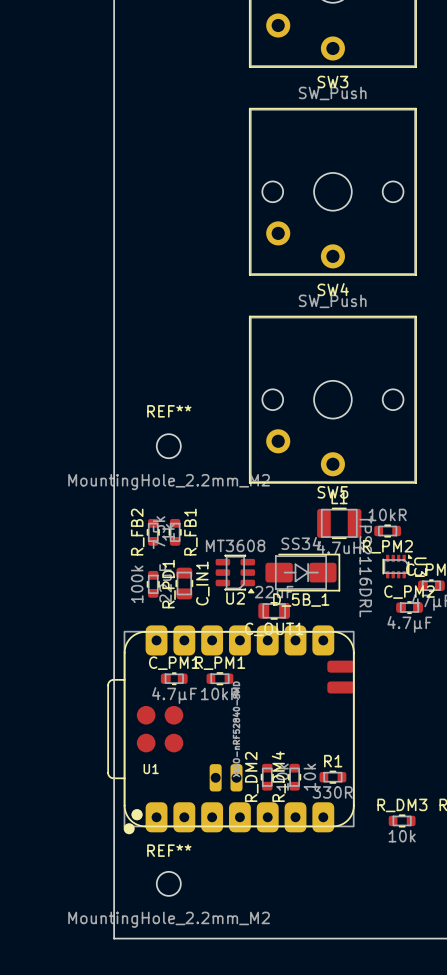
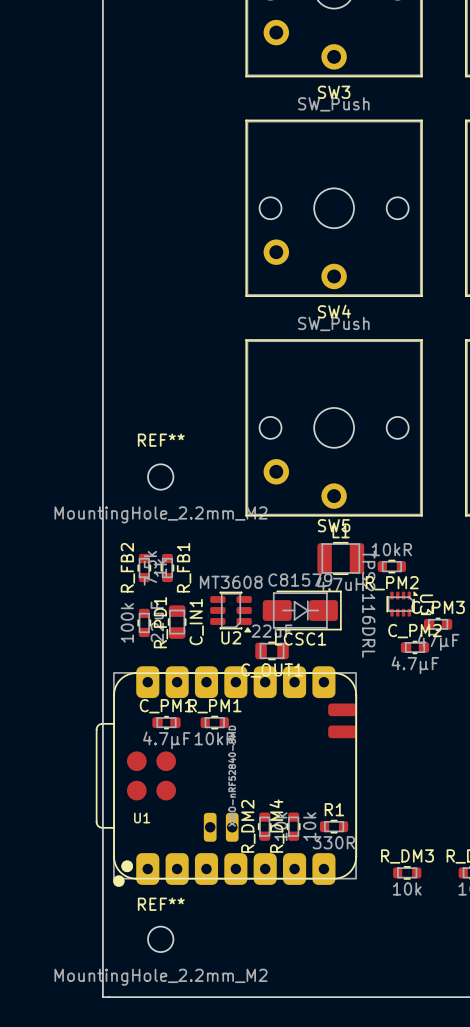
D_5B_1 value: SS34 (301, 543) -> C81579 (300, 580)
D_5B_1 name: D_5B_1 (301, 600) -> LCSC1 (300, 638)

